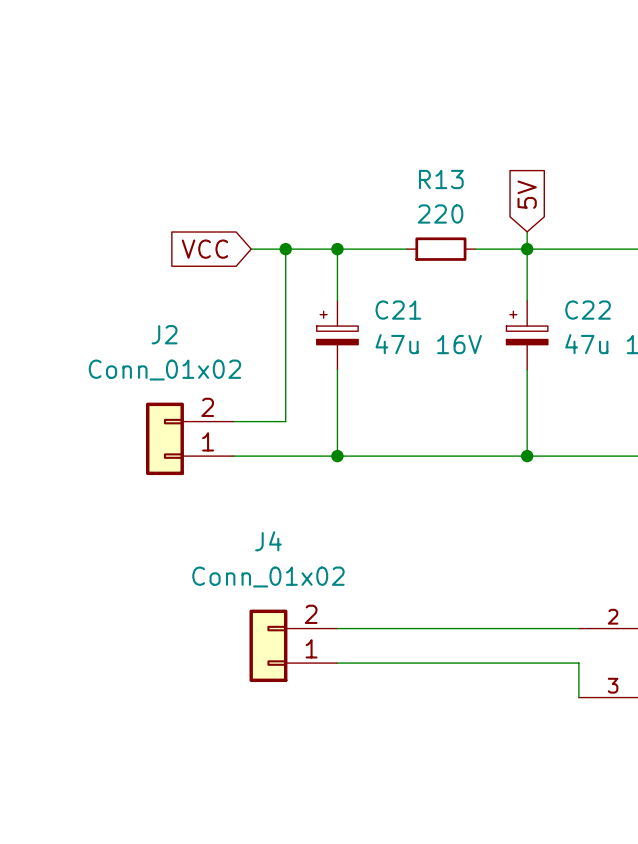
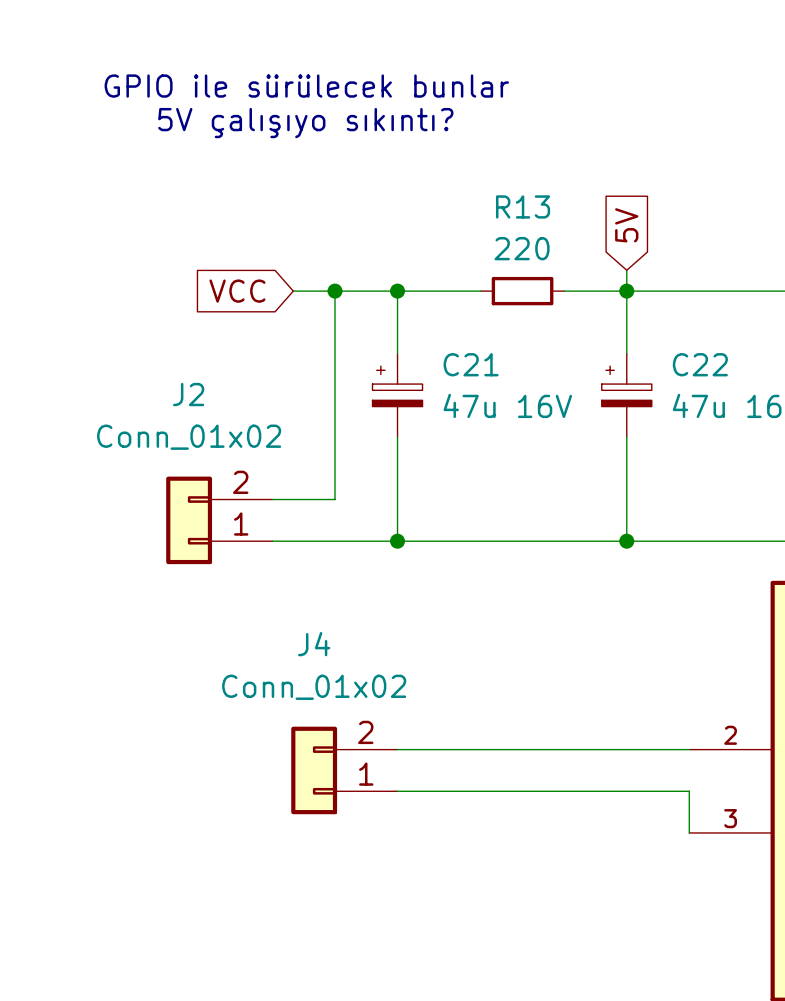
text: none -> GPIO ile sürülecek bunlar (306, 86)
text: none -> 5V çalışıyo sıkıntı? (305, 123)

